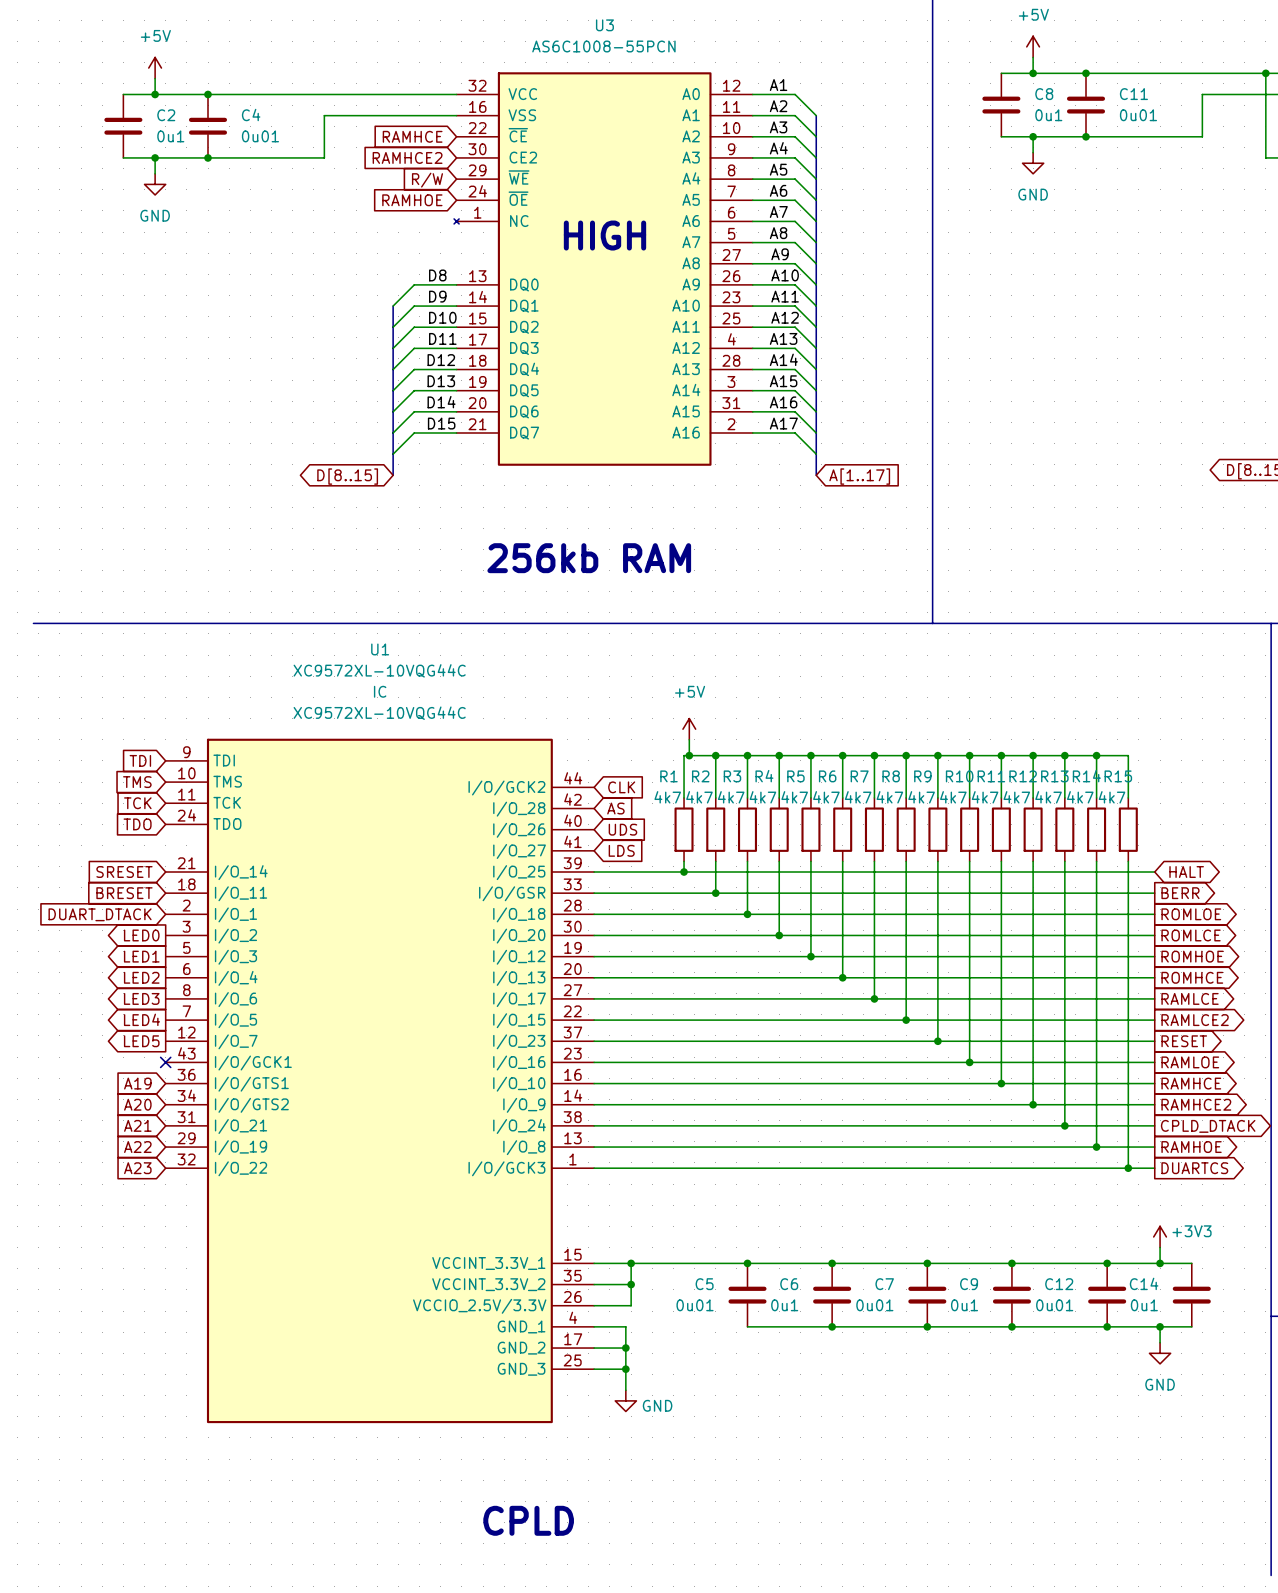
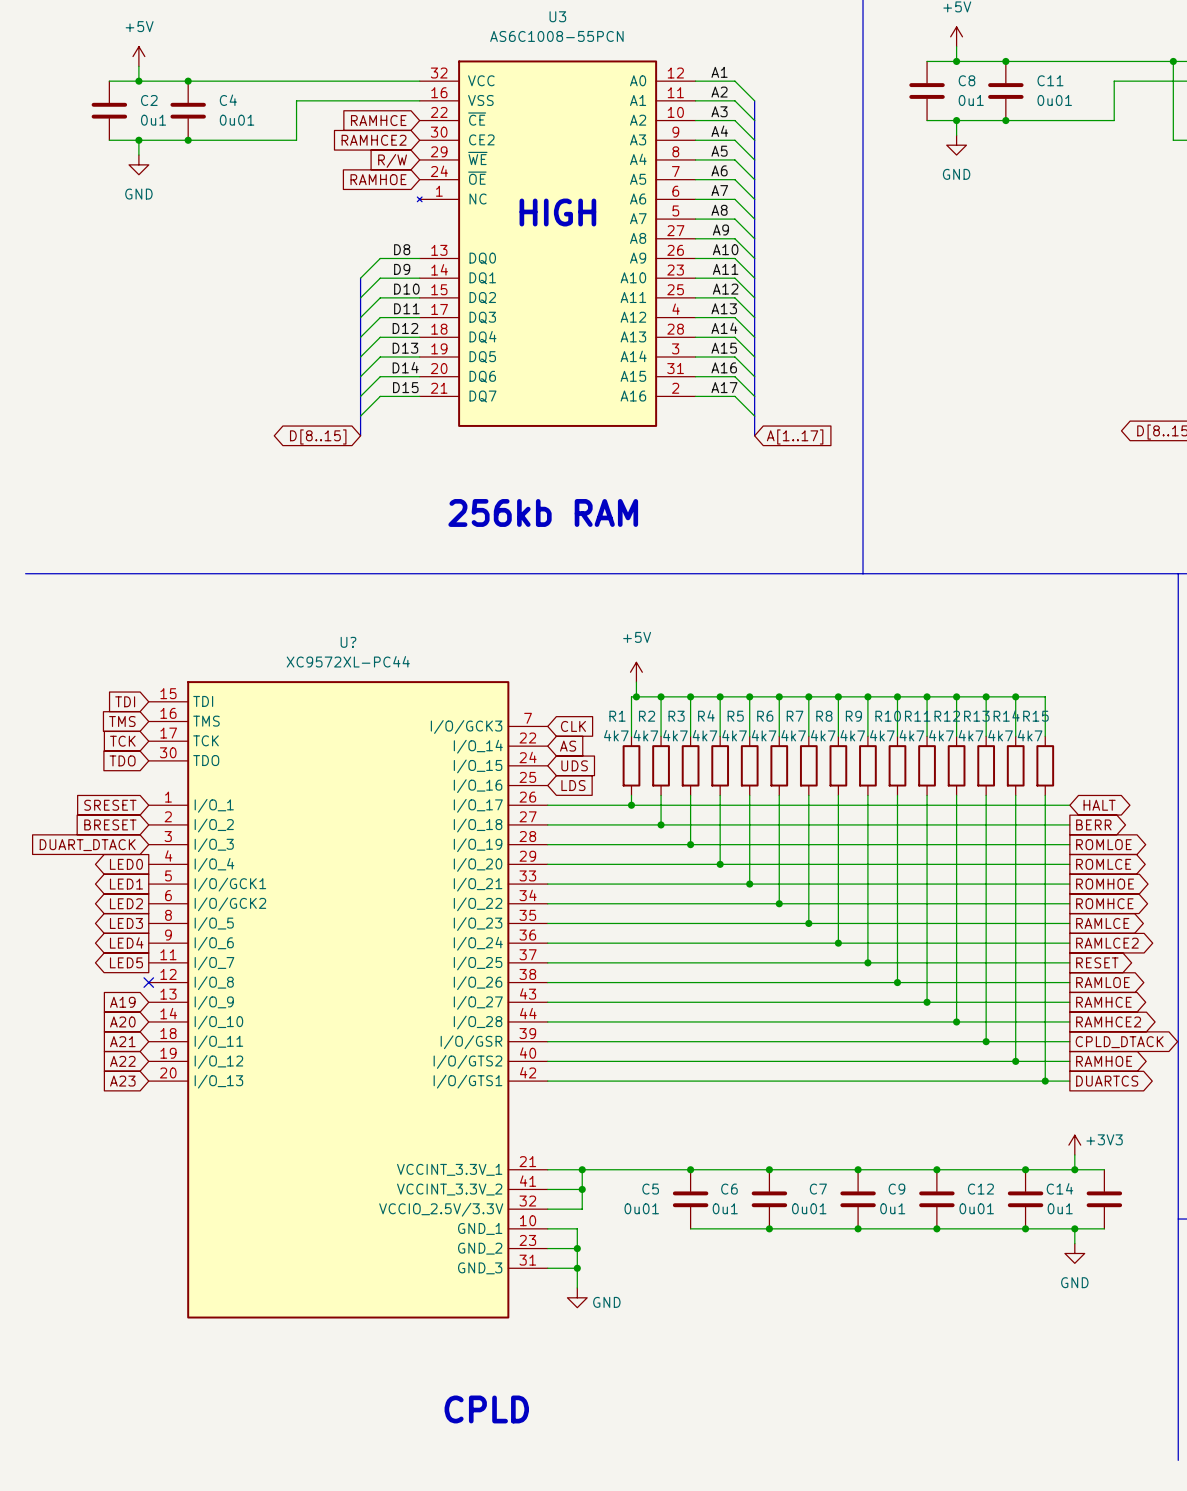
U1 name: U1 (380, 649) -> U? (348, 642)
U1 value: XC9572XL-10VQG44C (379, 670) -> XC9572XL-PC44 (348, 661)
U1 text: IC (380, 691) -> none
U1 text: XC9572XL-10VQG44C (379, 713) -> none
U1 symbol: [165, 738, 595, 1424] -> [148, 681, 548, 1319]

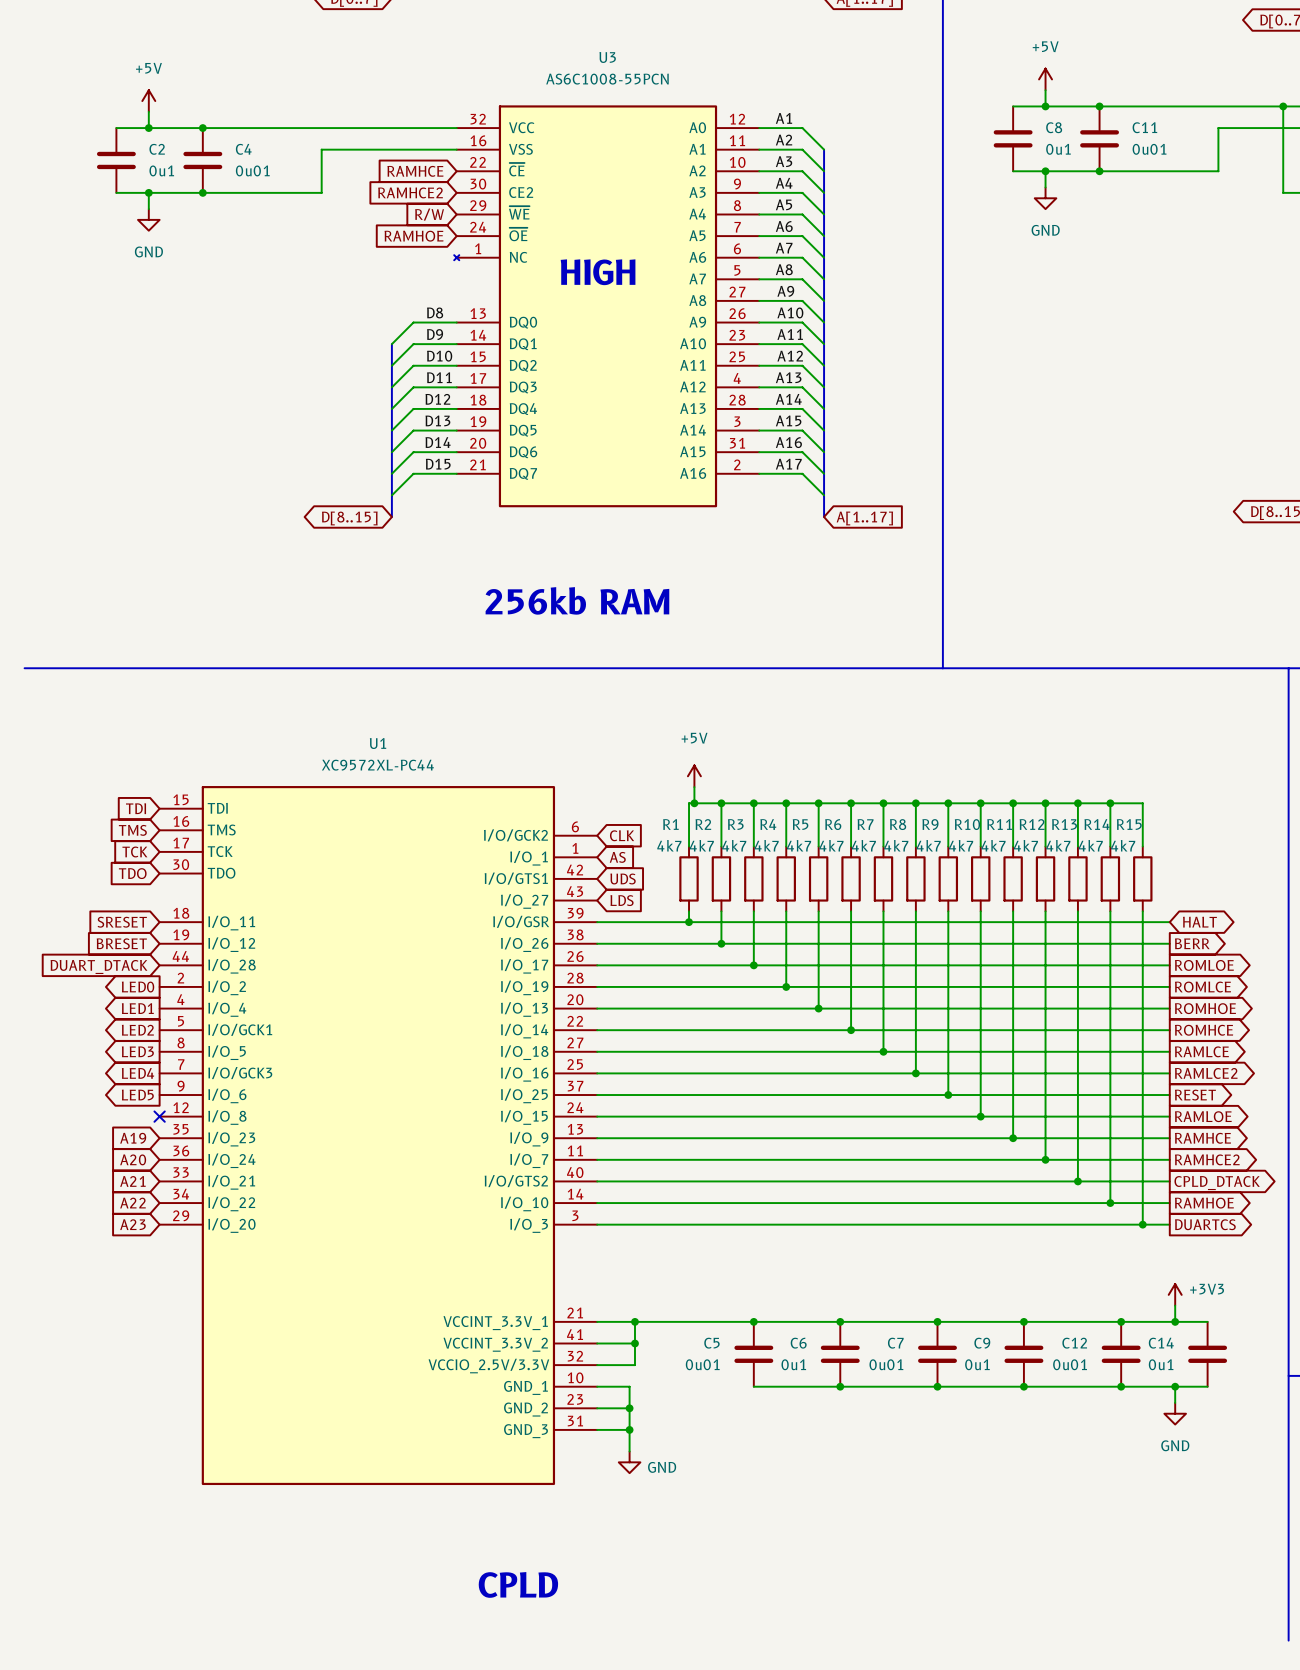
U? name: U? (348, 642) -> U1 (378, 743)
U? symbol: [148, 681, 548, 1319] -> [159, 786, 598, 1486]

